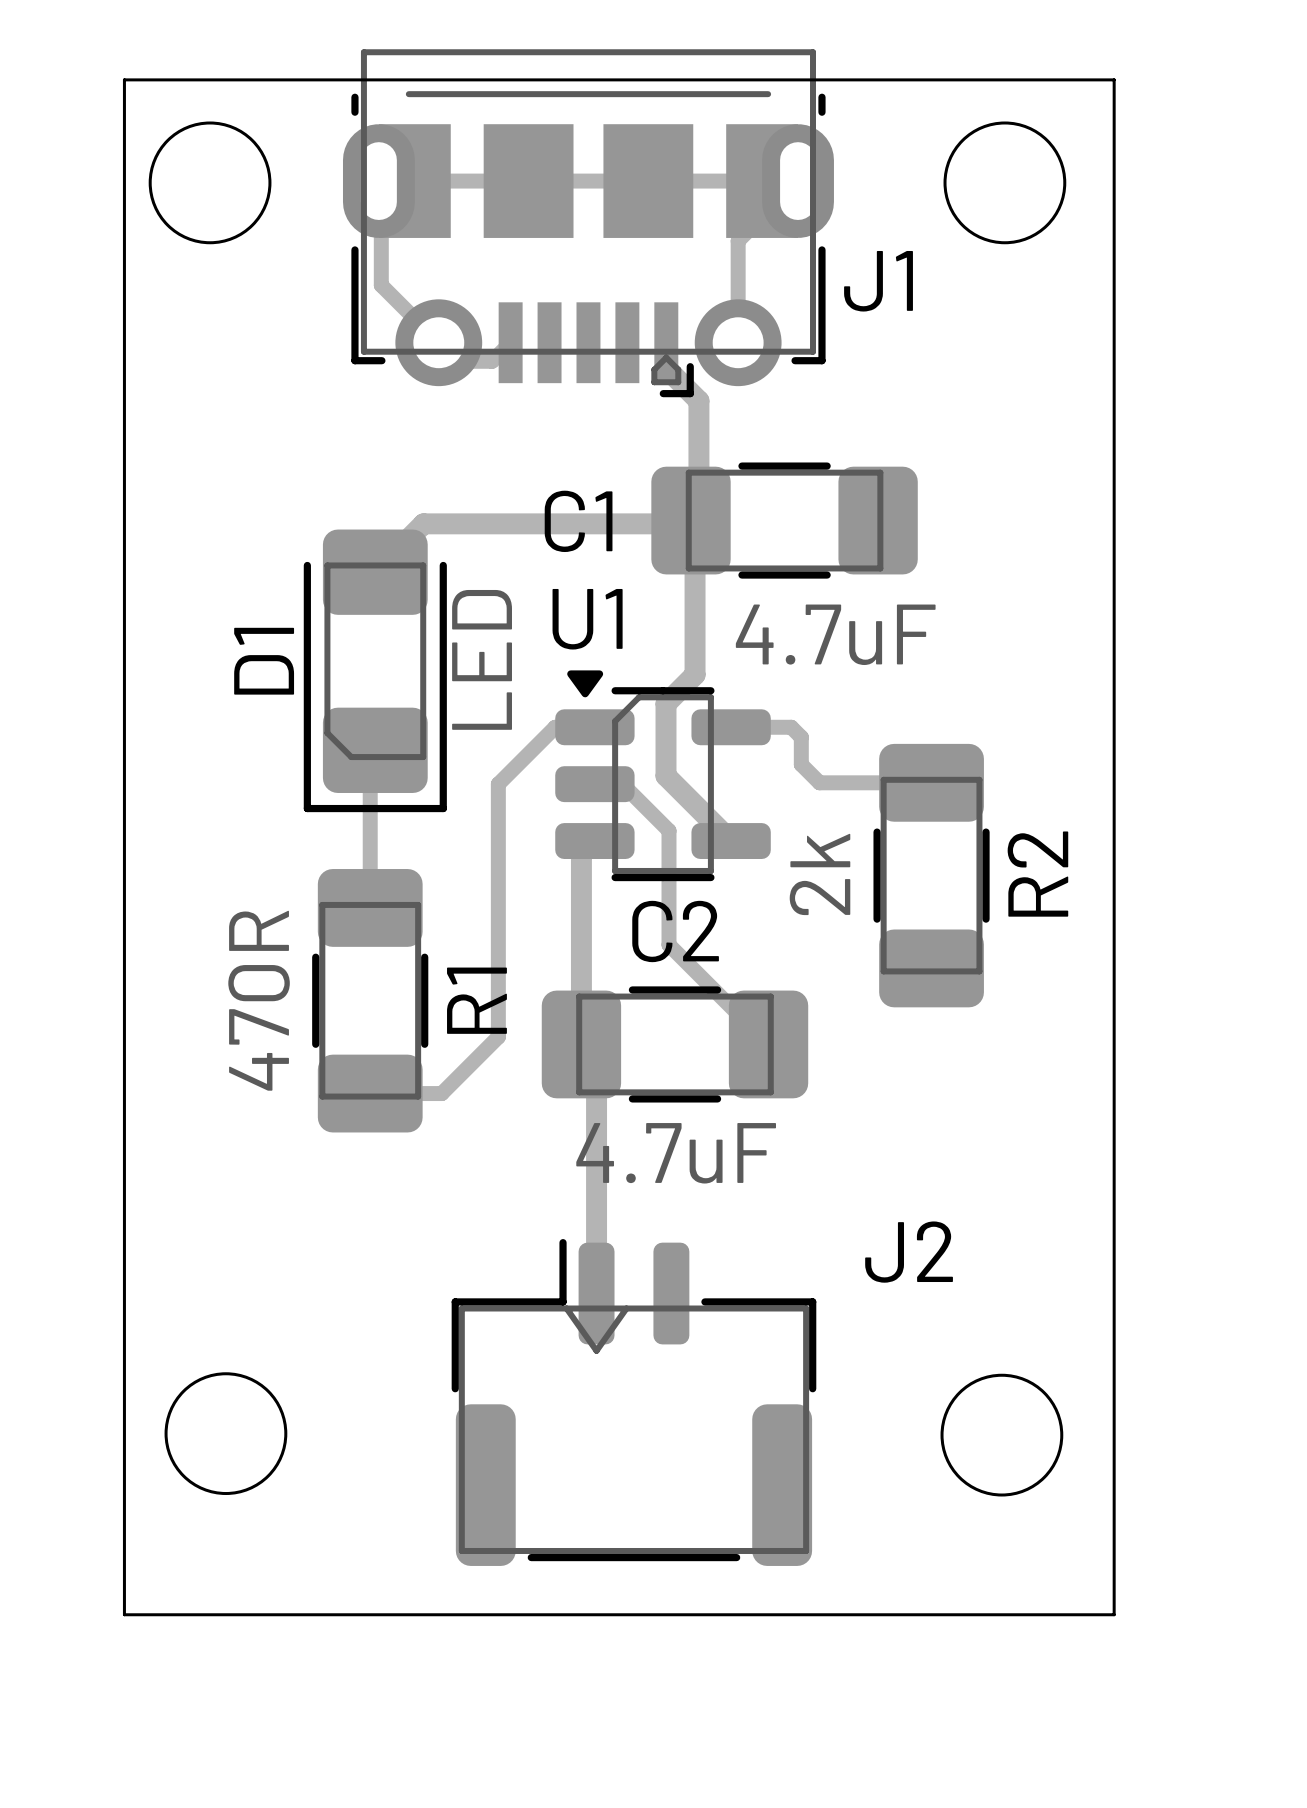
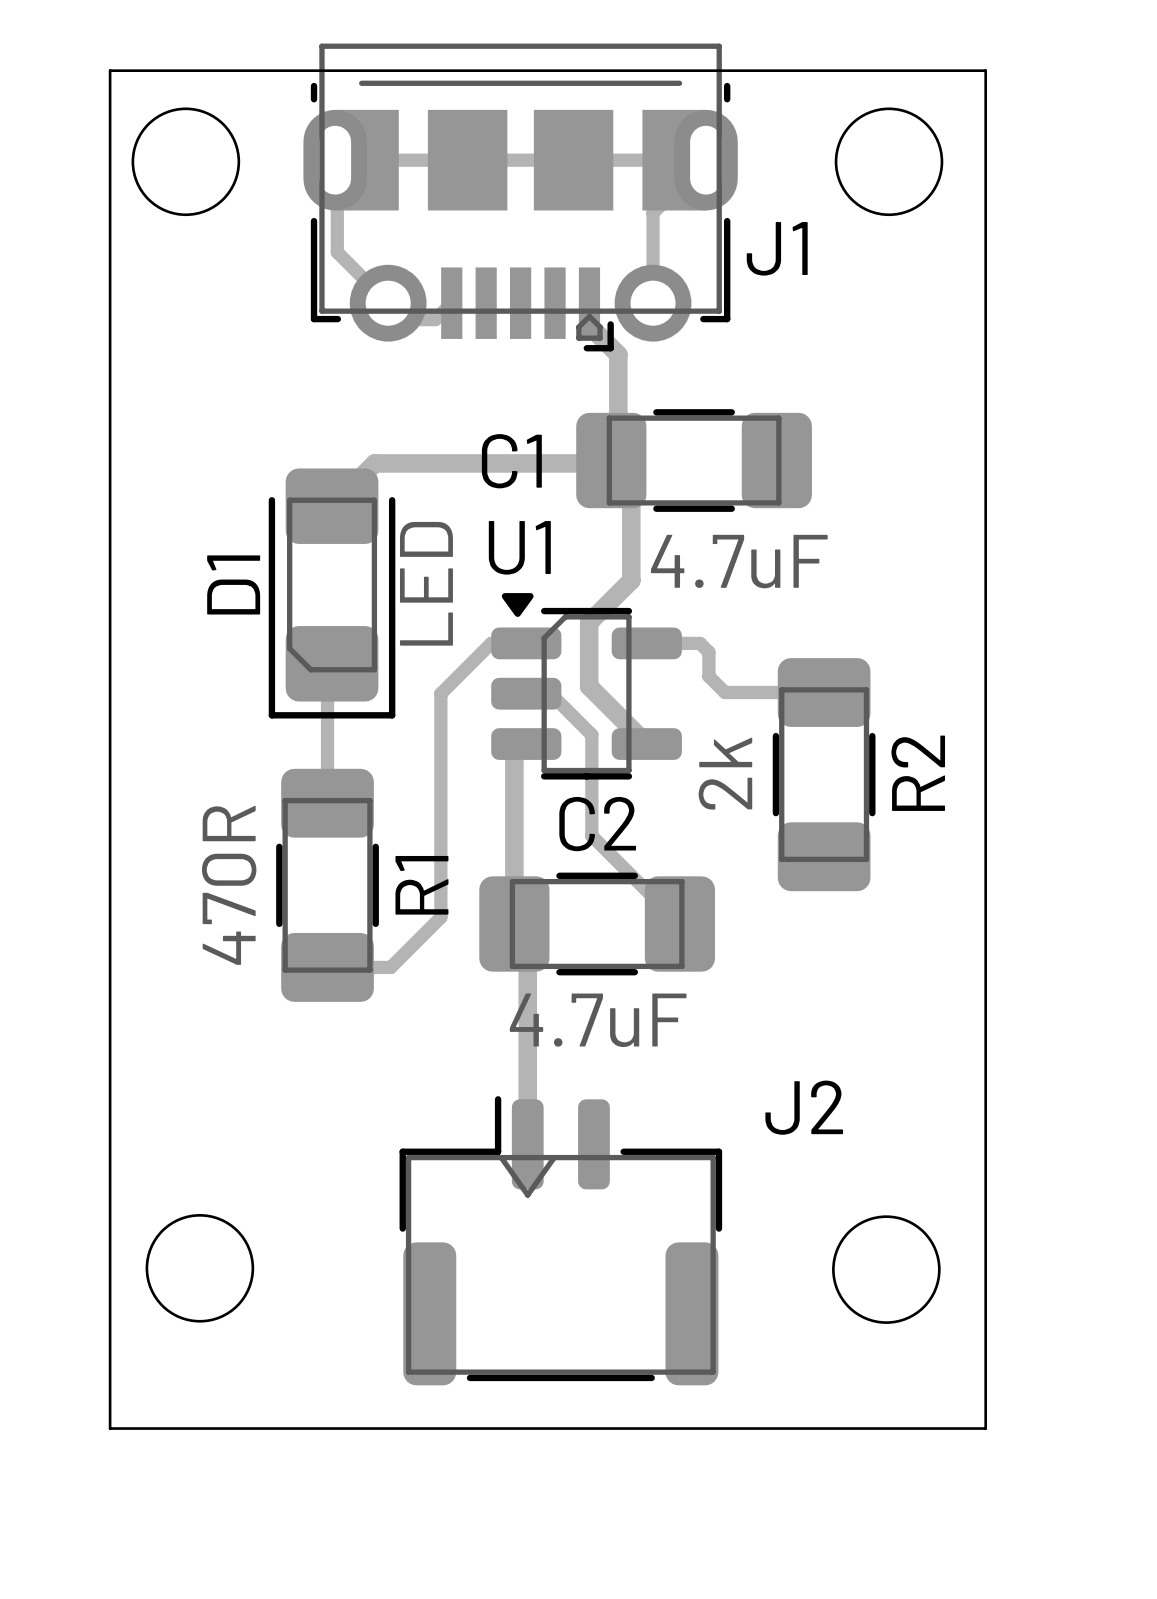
track: (695, 524) (695, 674) -> (614, 464) (631, 480) (631, 580) (614, 596)

